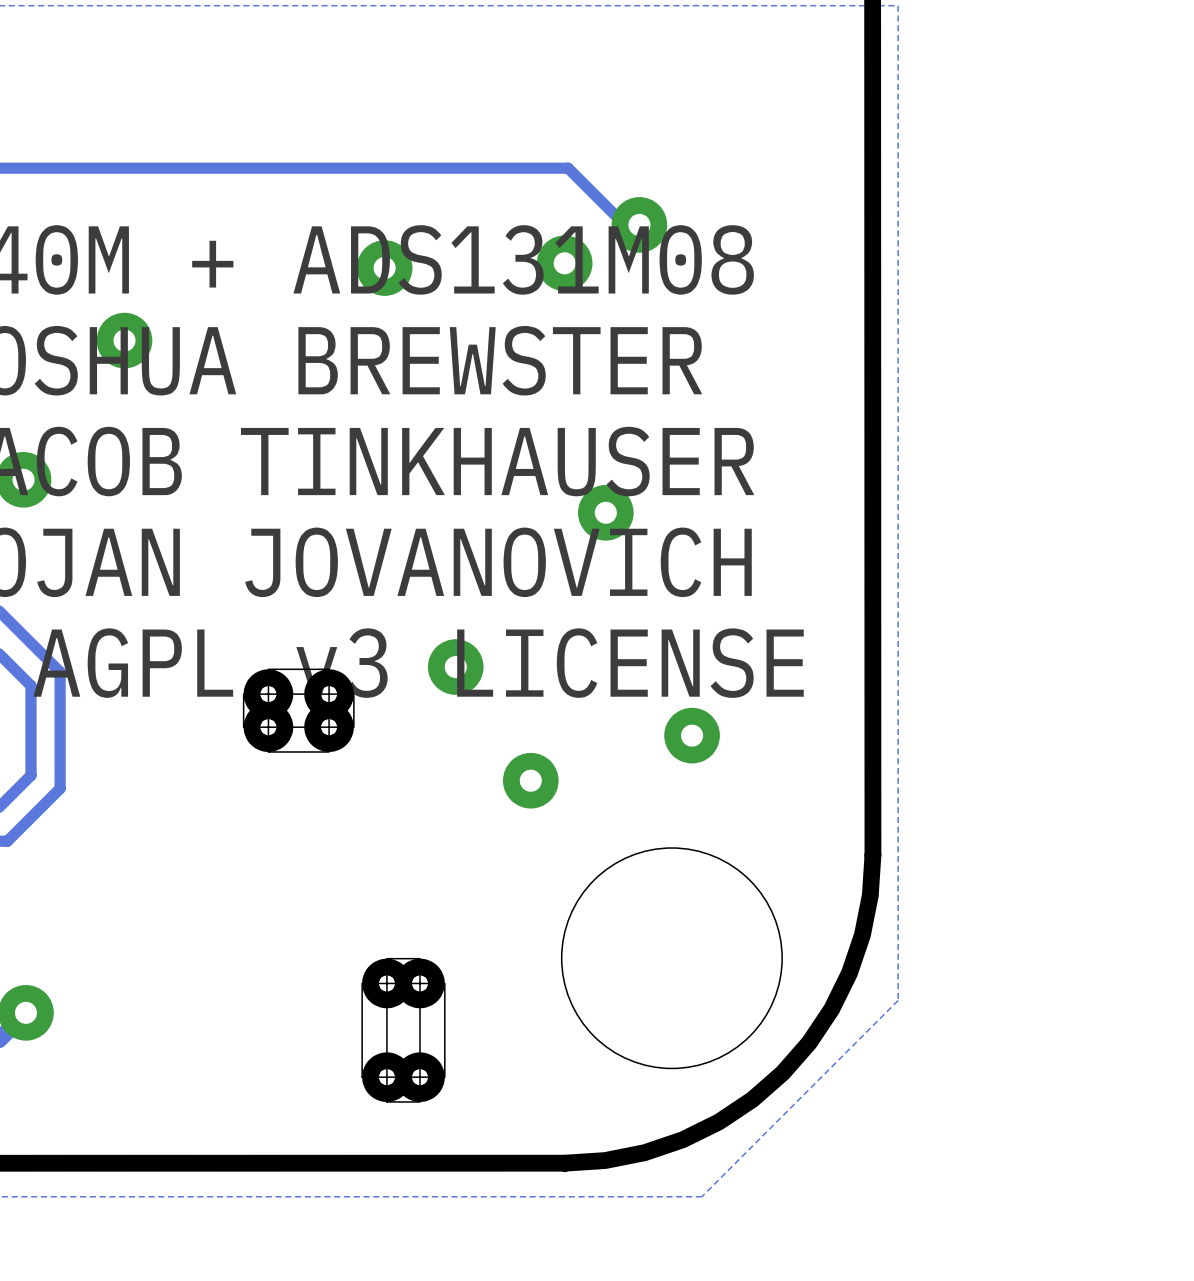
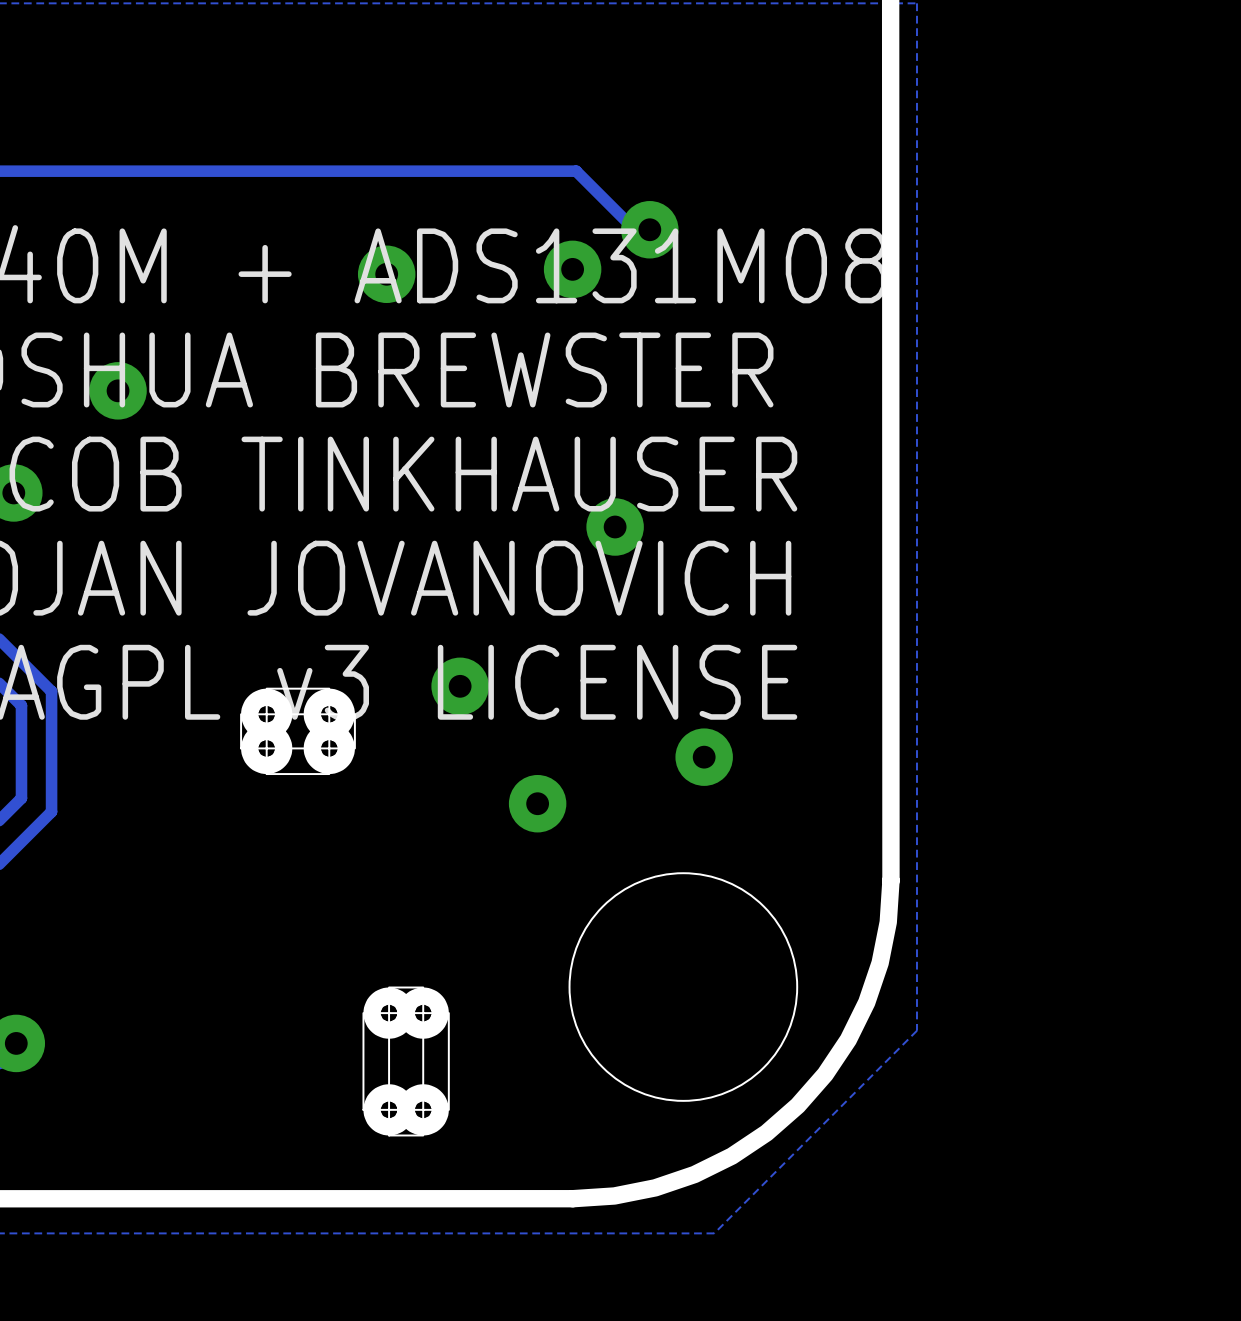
via position: (124, 340) -> (118, 390)

